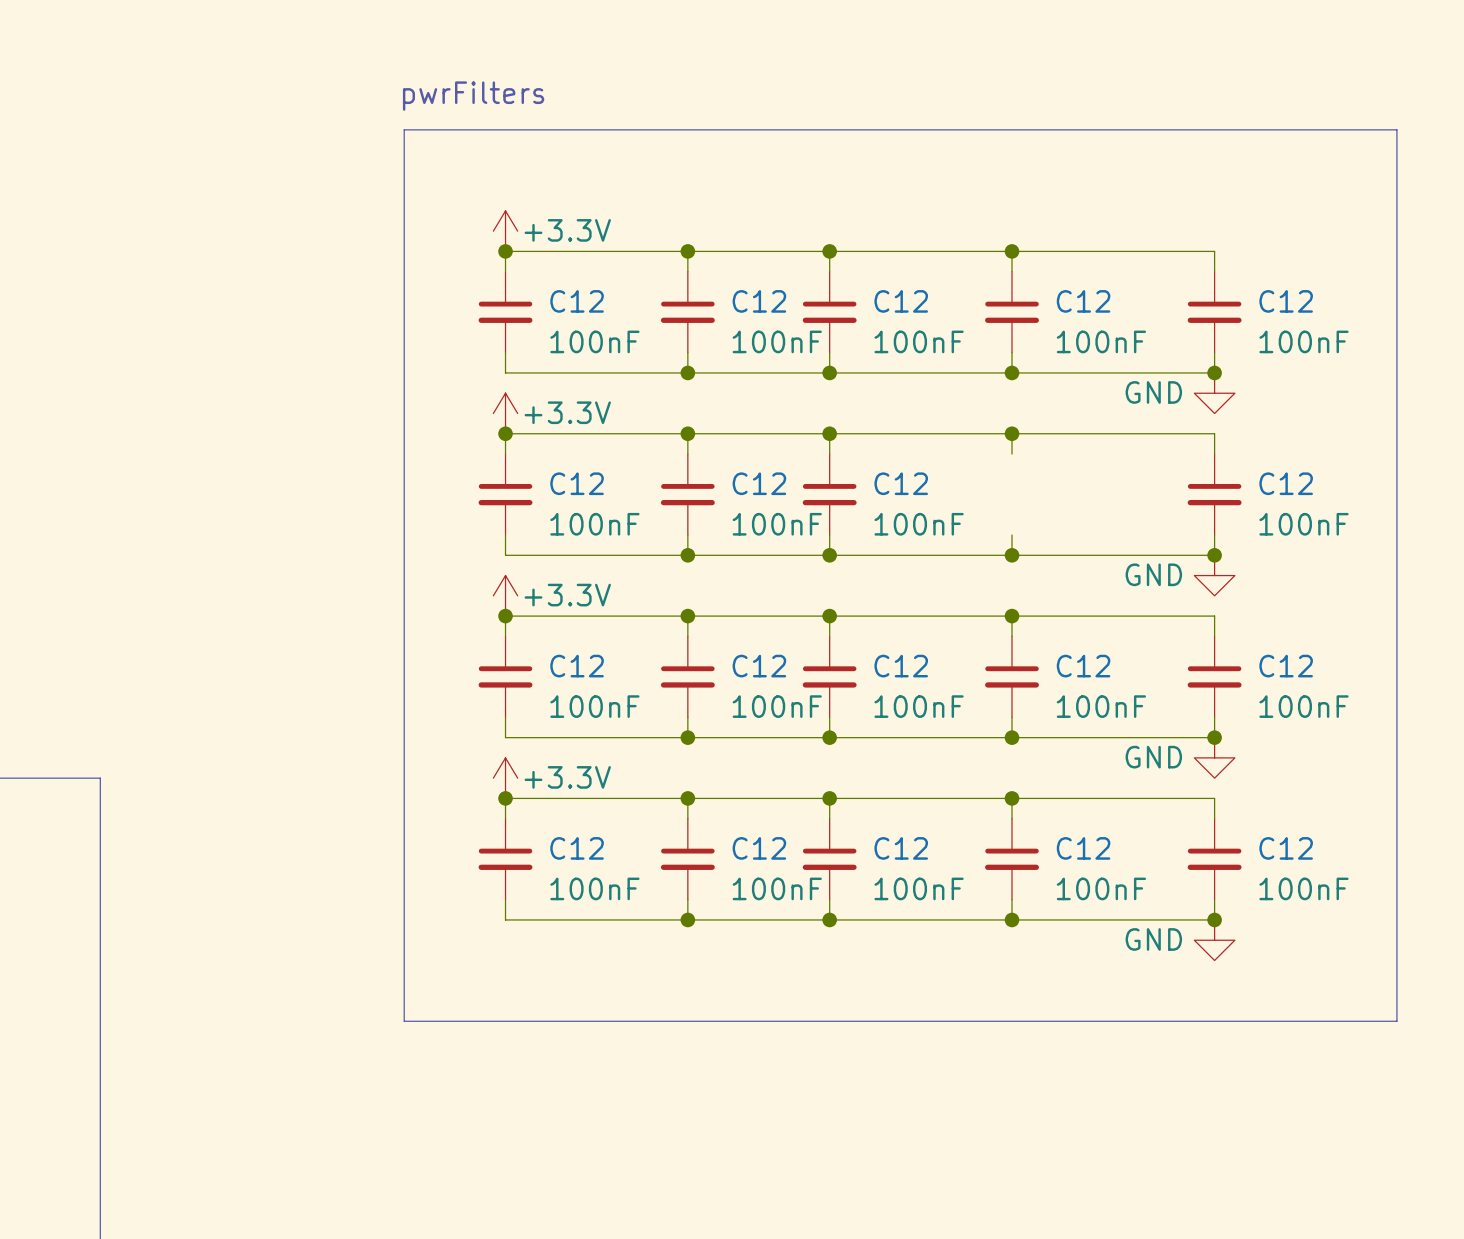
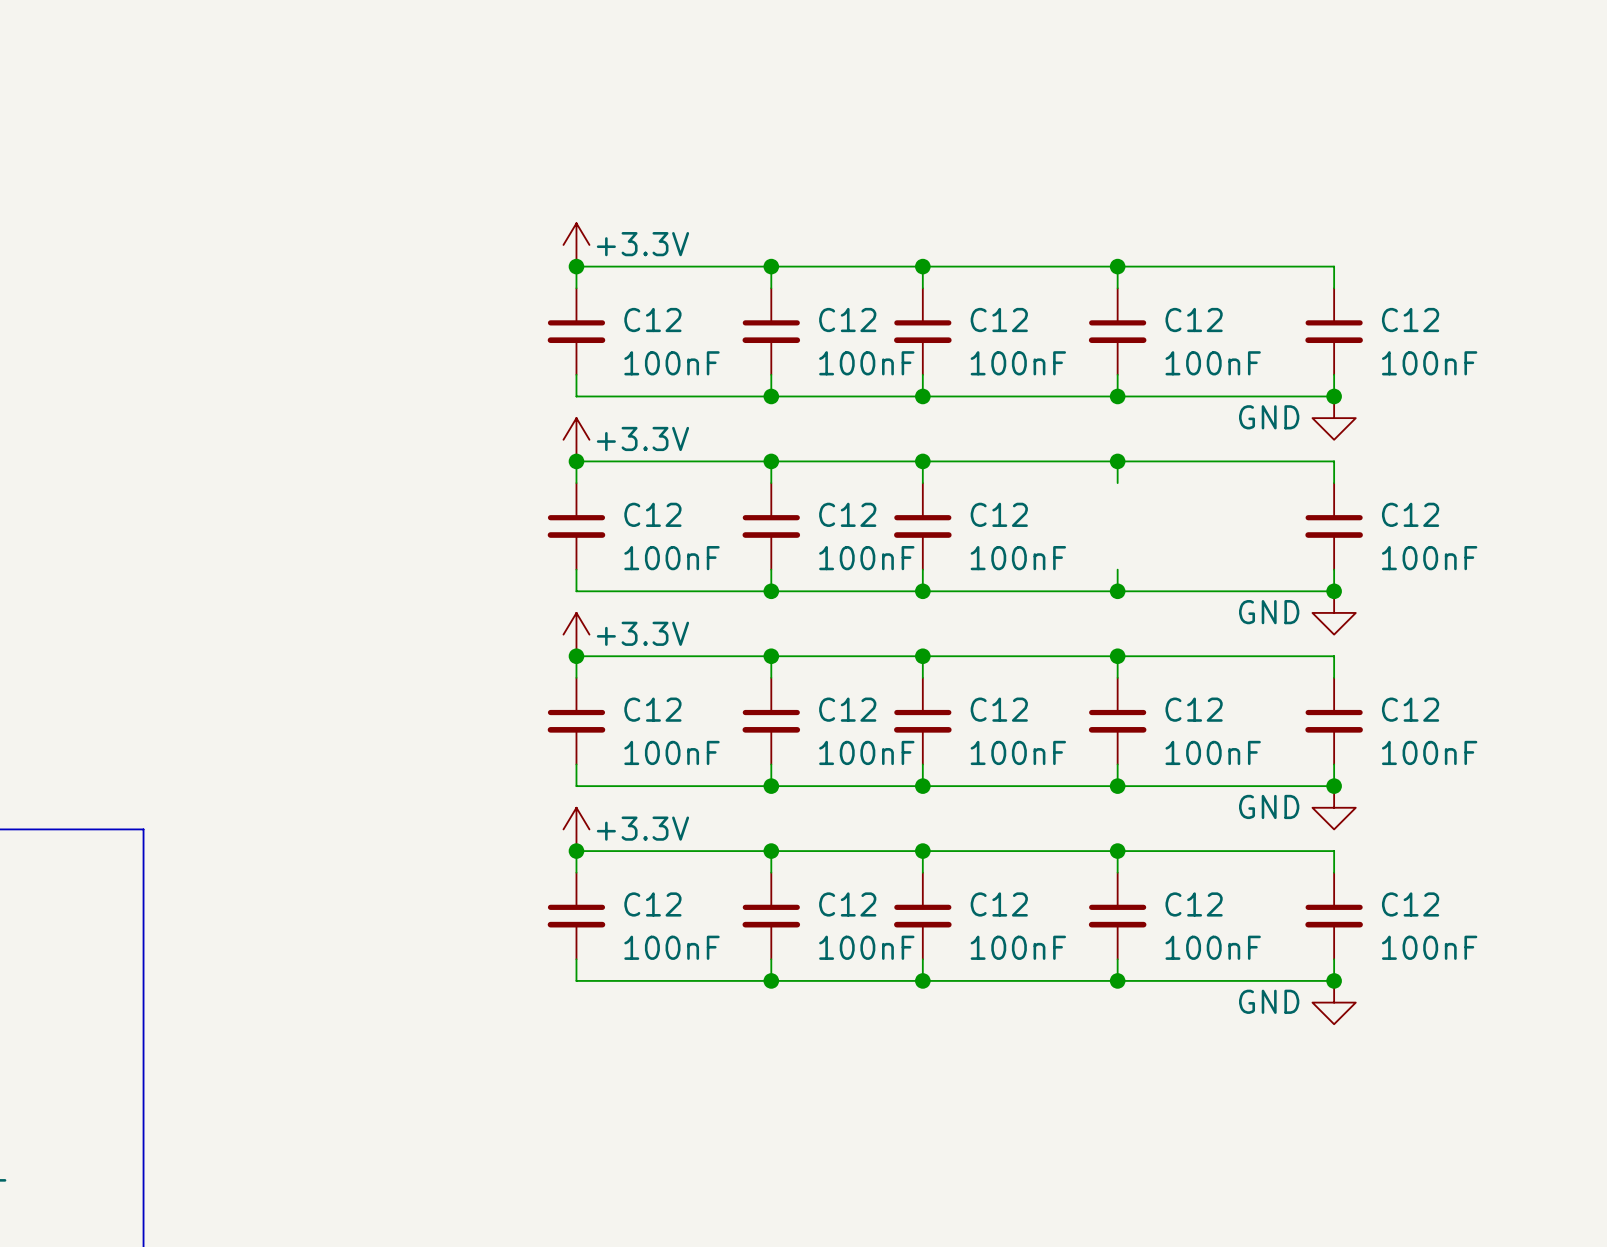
text: pwrFilters (473, 96) -> none
line: (404, 129) (1396, 129) (1396, 1021) (404, 1021) (404, 129) -> none

